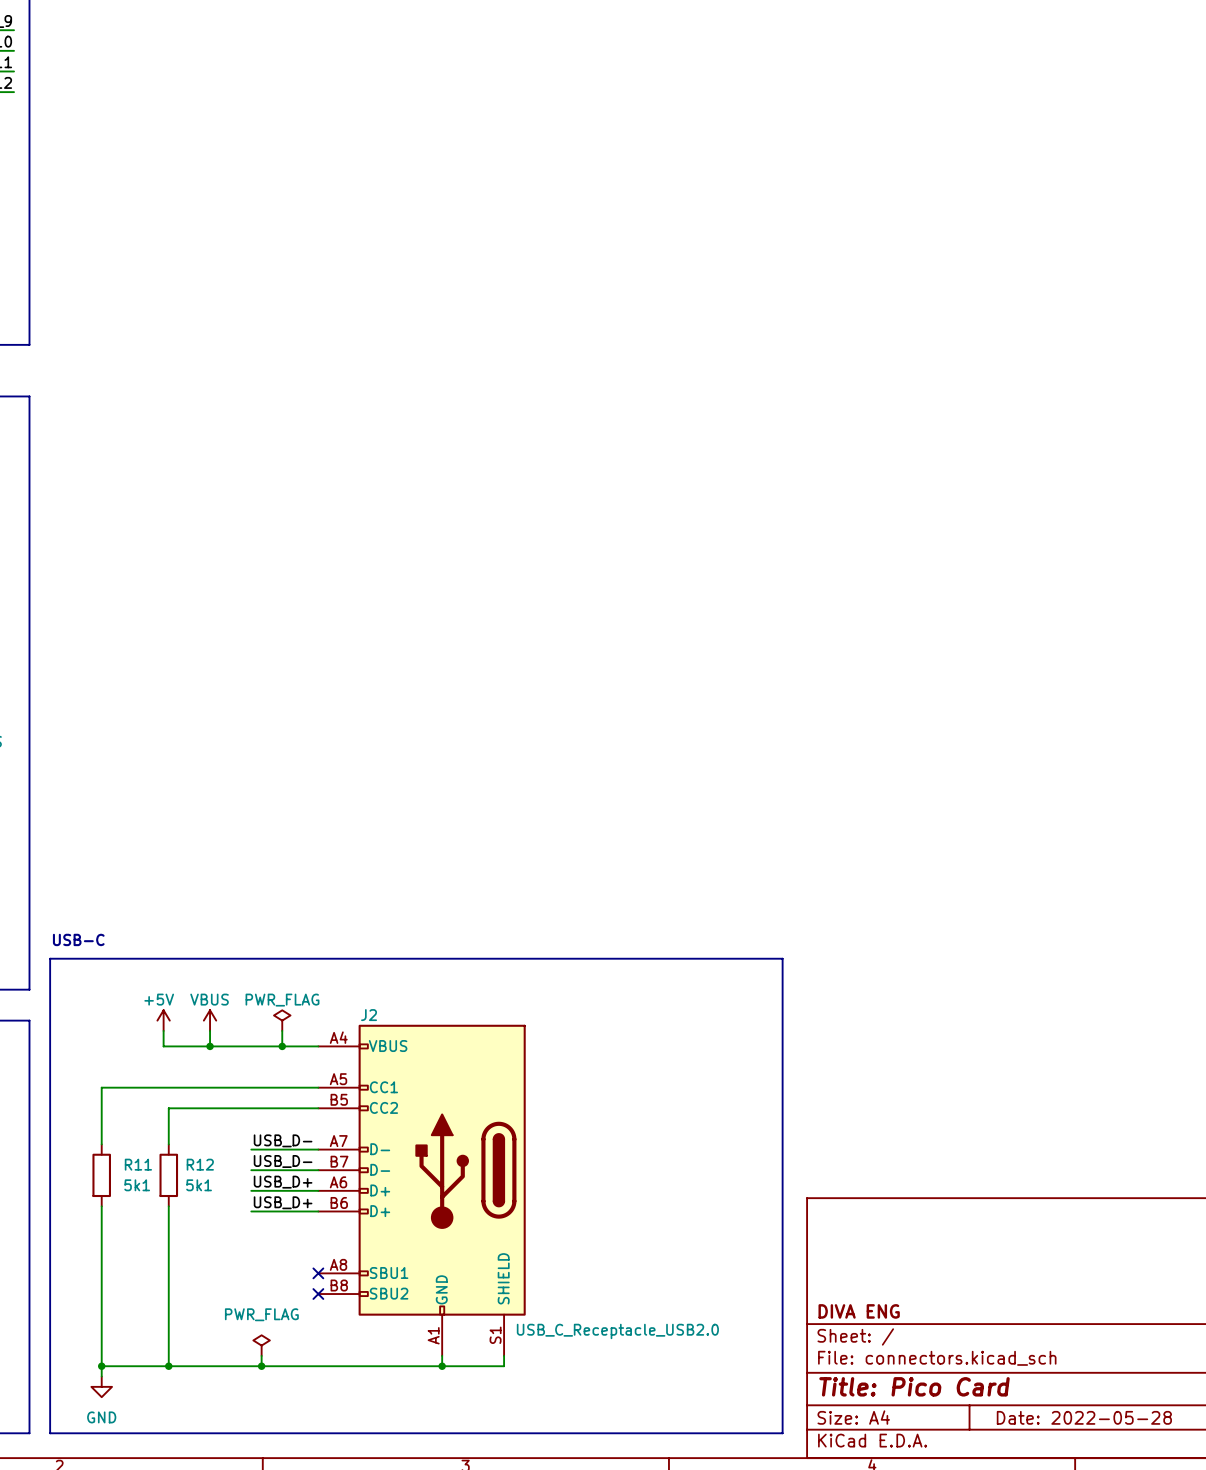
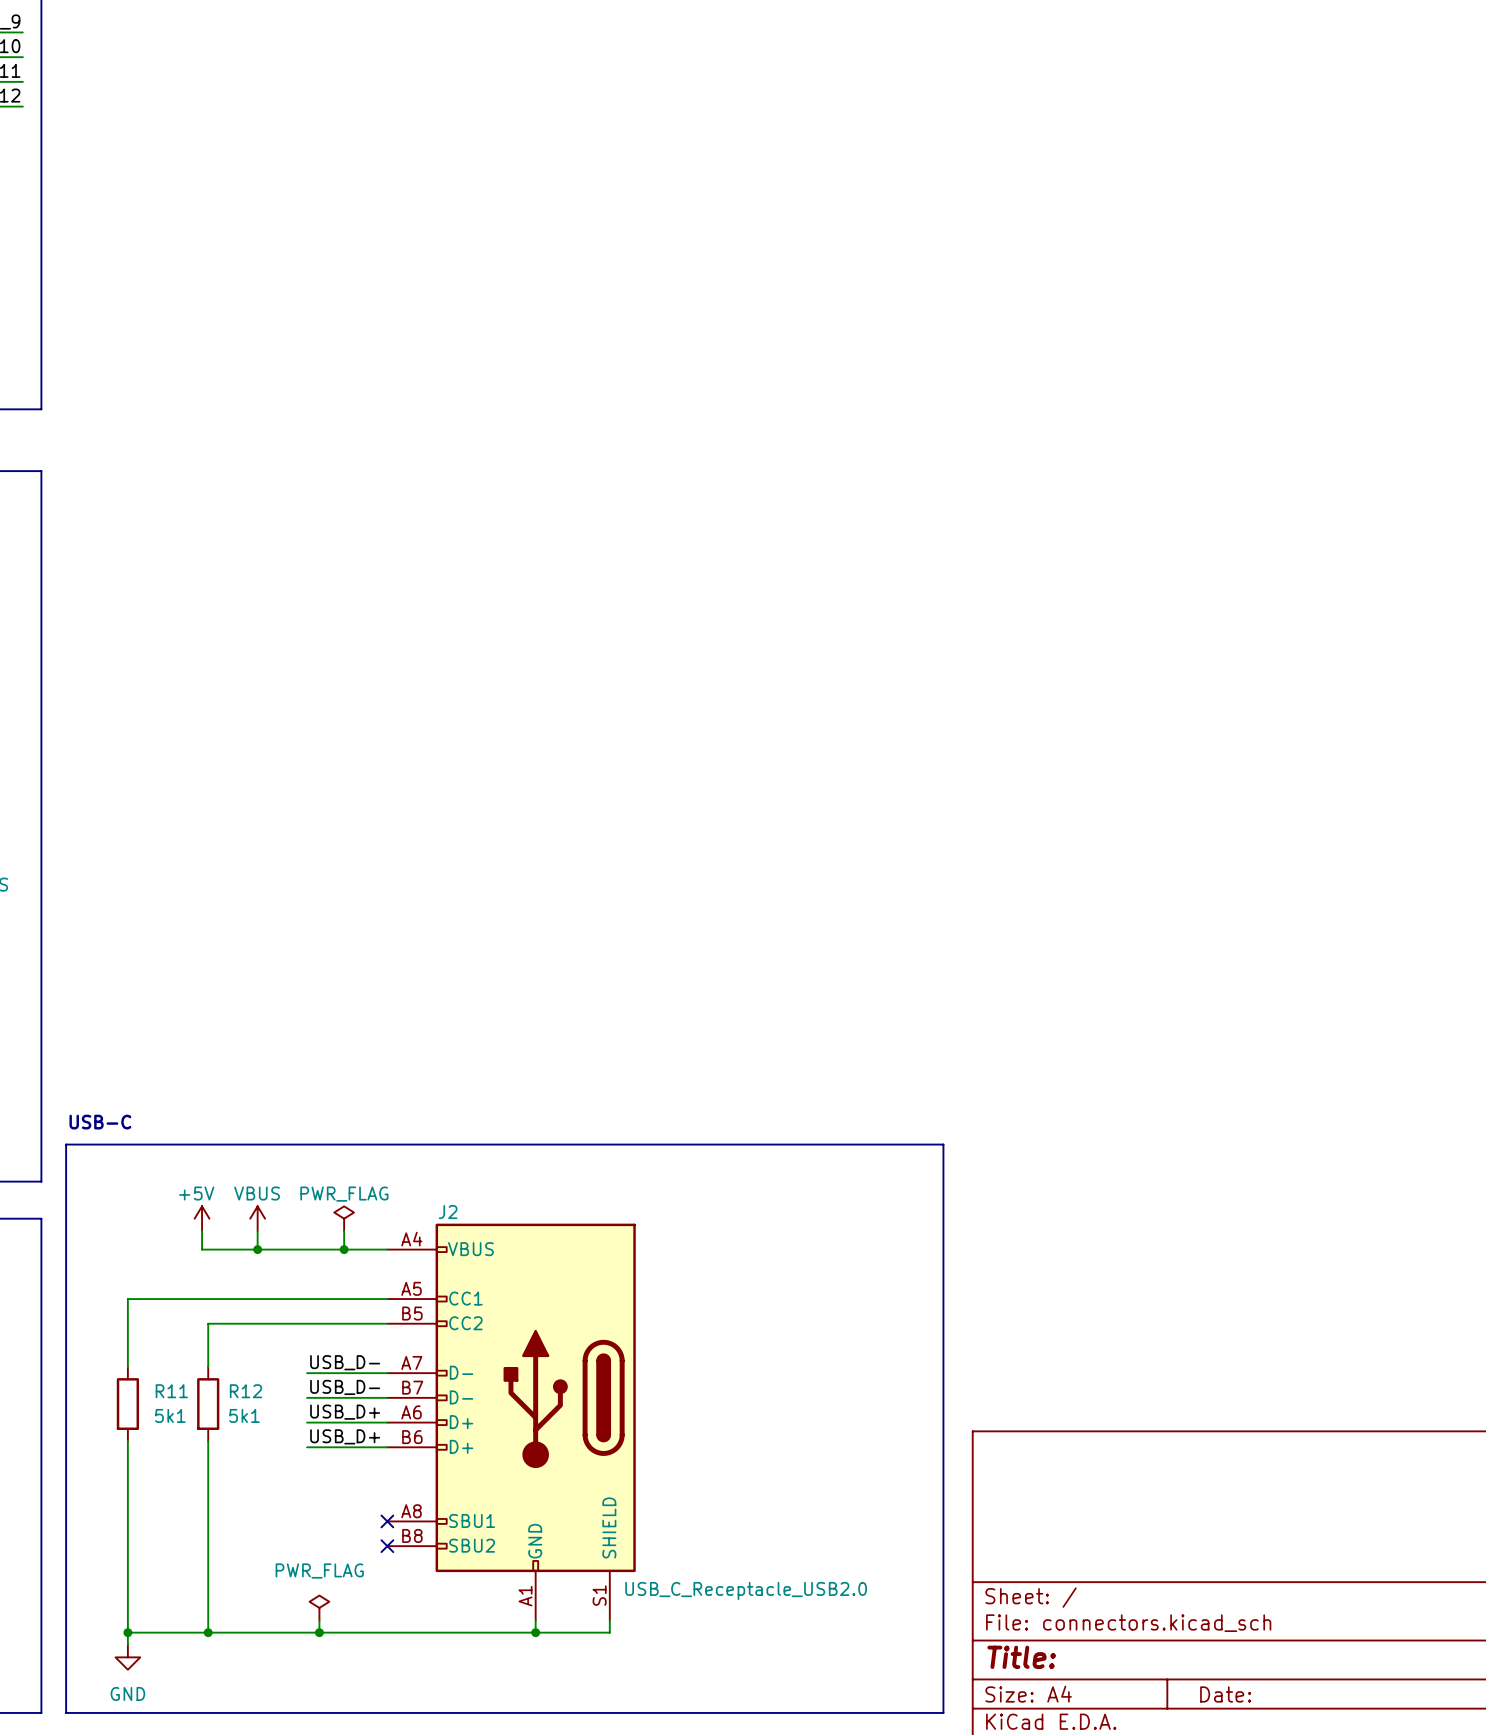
title block: DIVA ENG (859, 1311) -> none
title block: Title: Pico Card (914, 1386) -> Title: (1021, 1657)
title block: Date: 2022-05-28 (1084, 1417) -> Date: (1225, 1694)

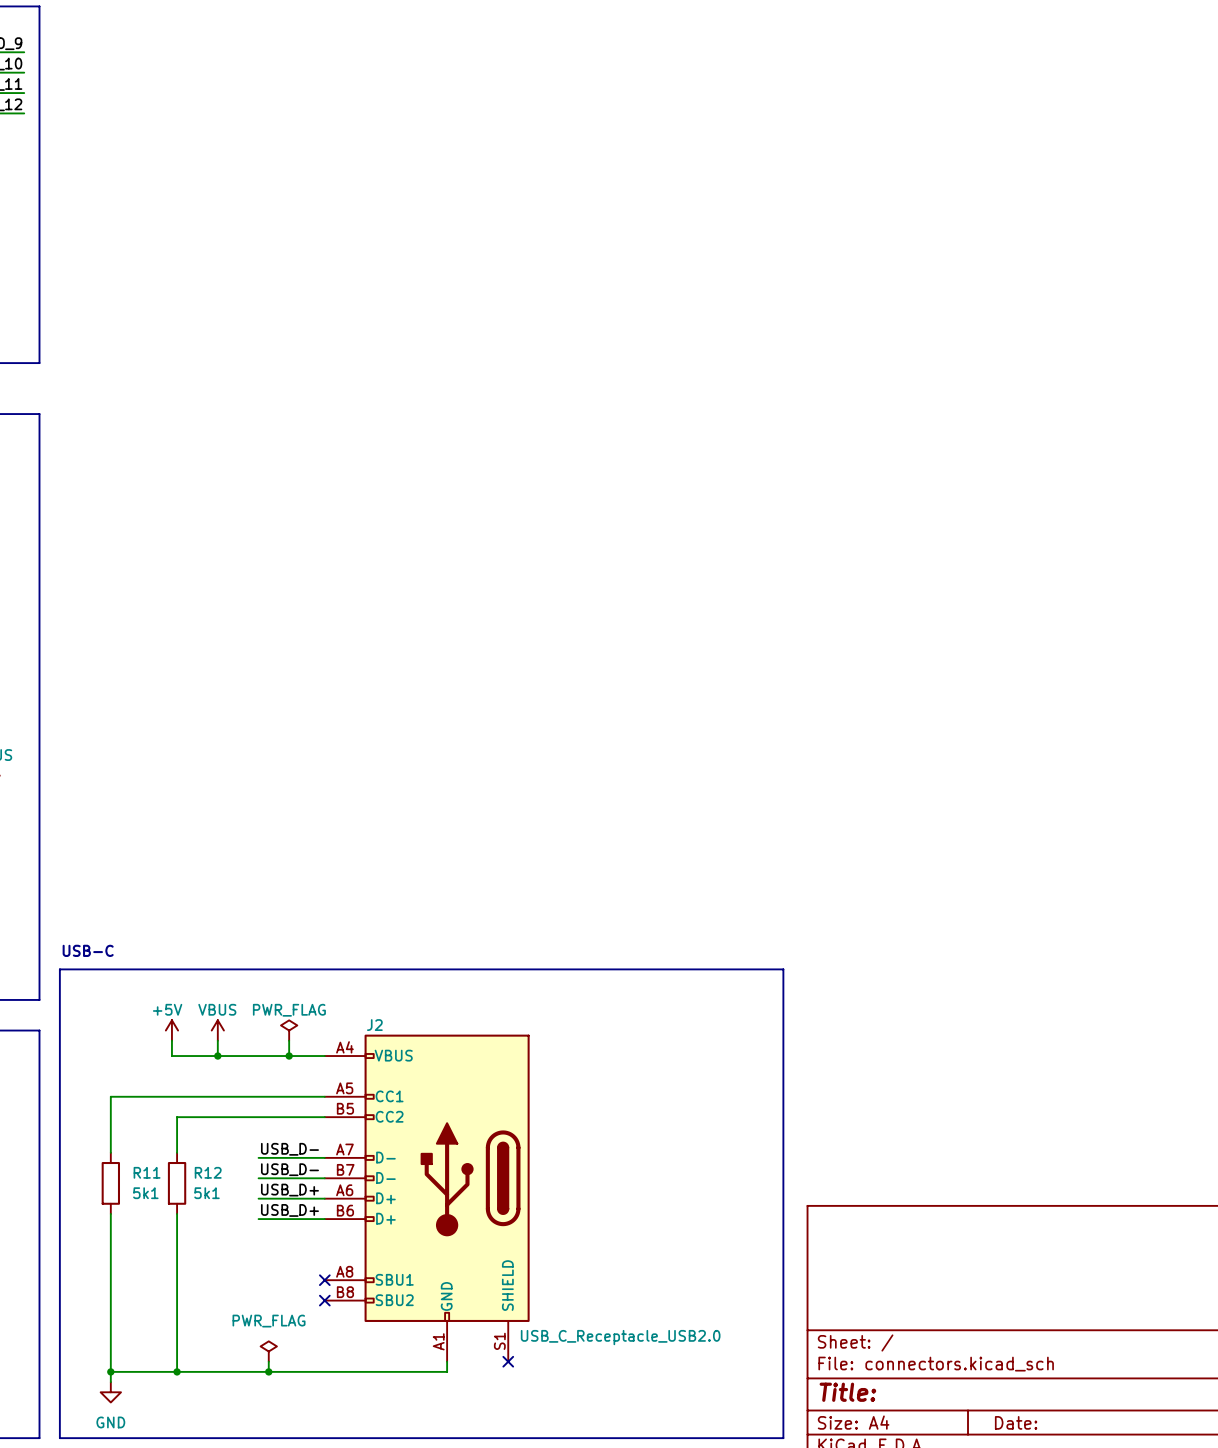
wire: (609, 1620) (609, 1632) (535, 1632) -> none
no-connect mark: none -> (508, 1361)
junction: (535, 1632) -> none

